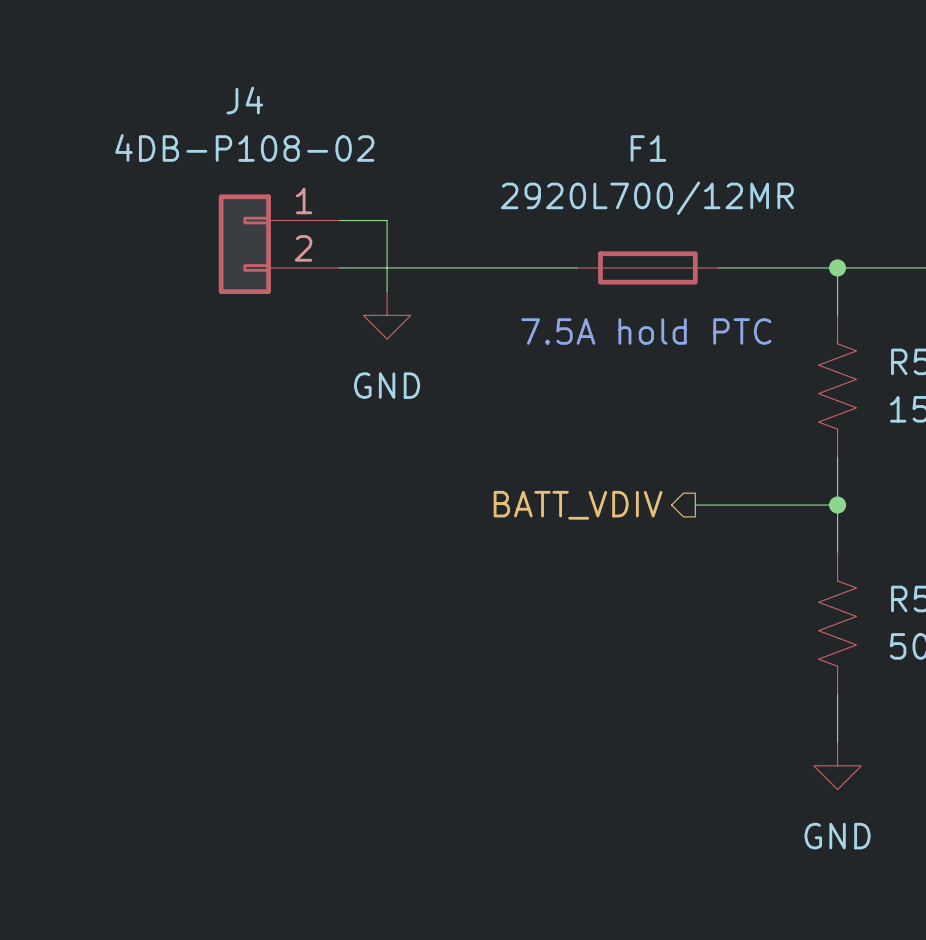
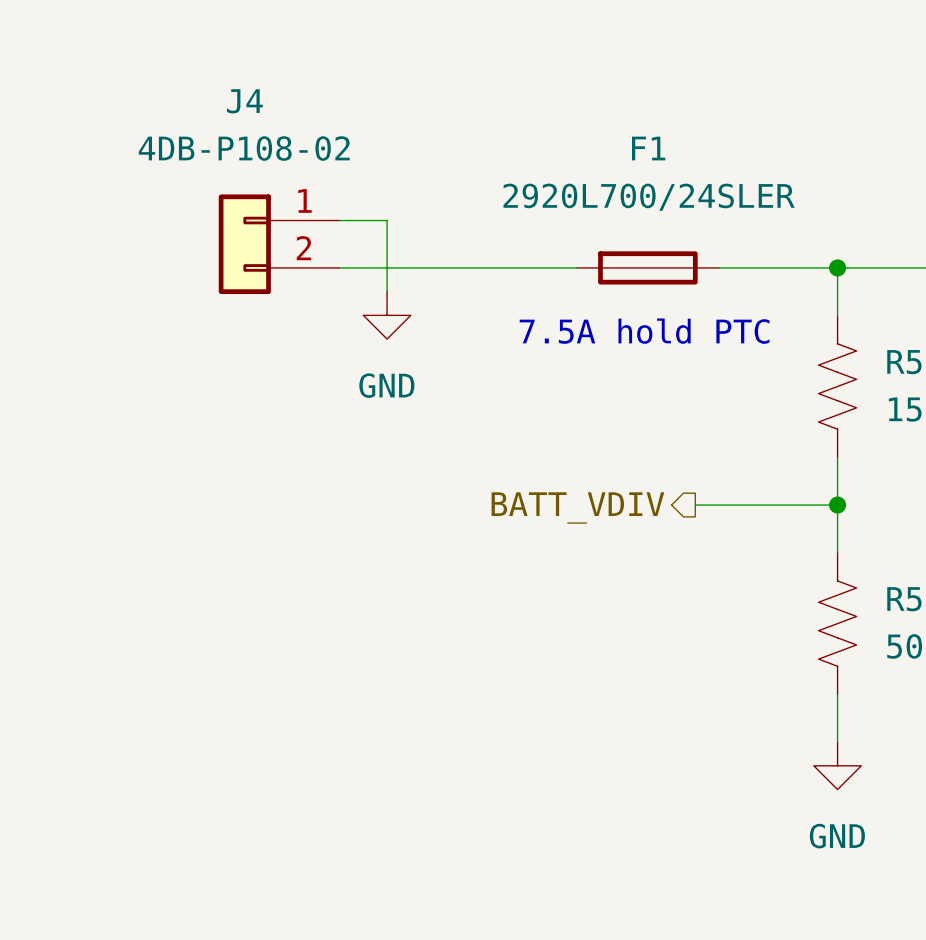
F1 value: 2920L700/12MR (647, 198) -> 2920L700/24SLER (649, 197)

